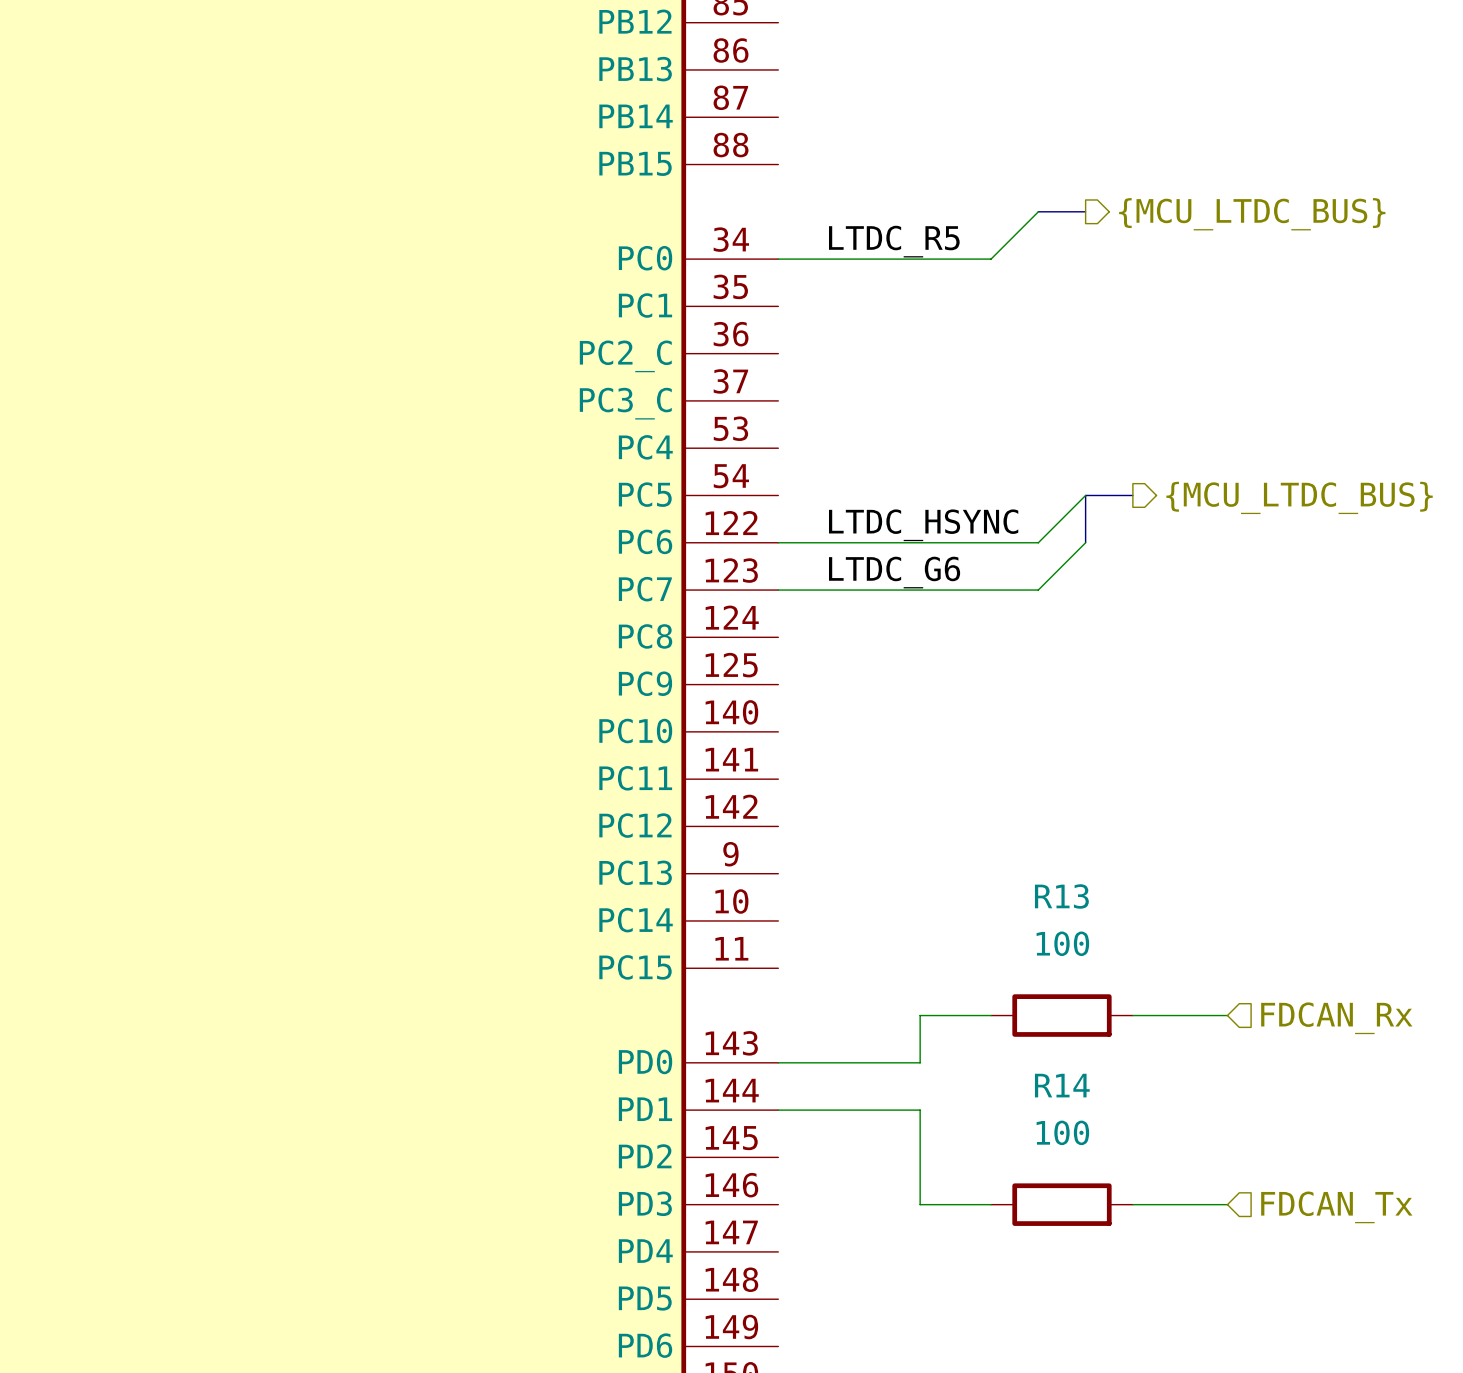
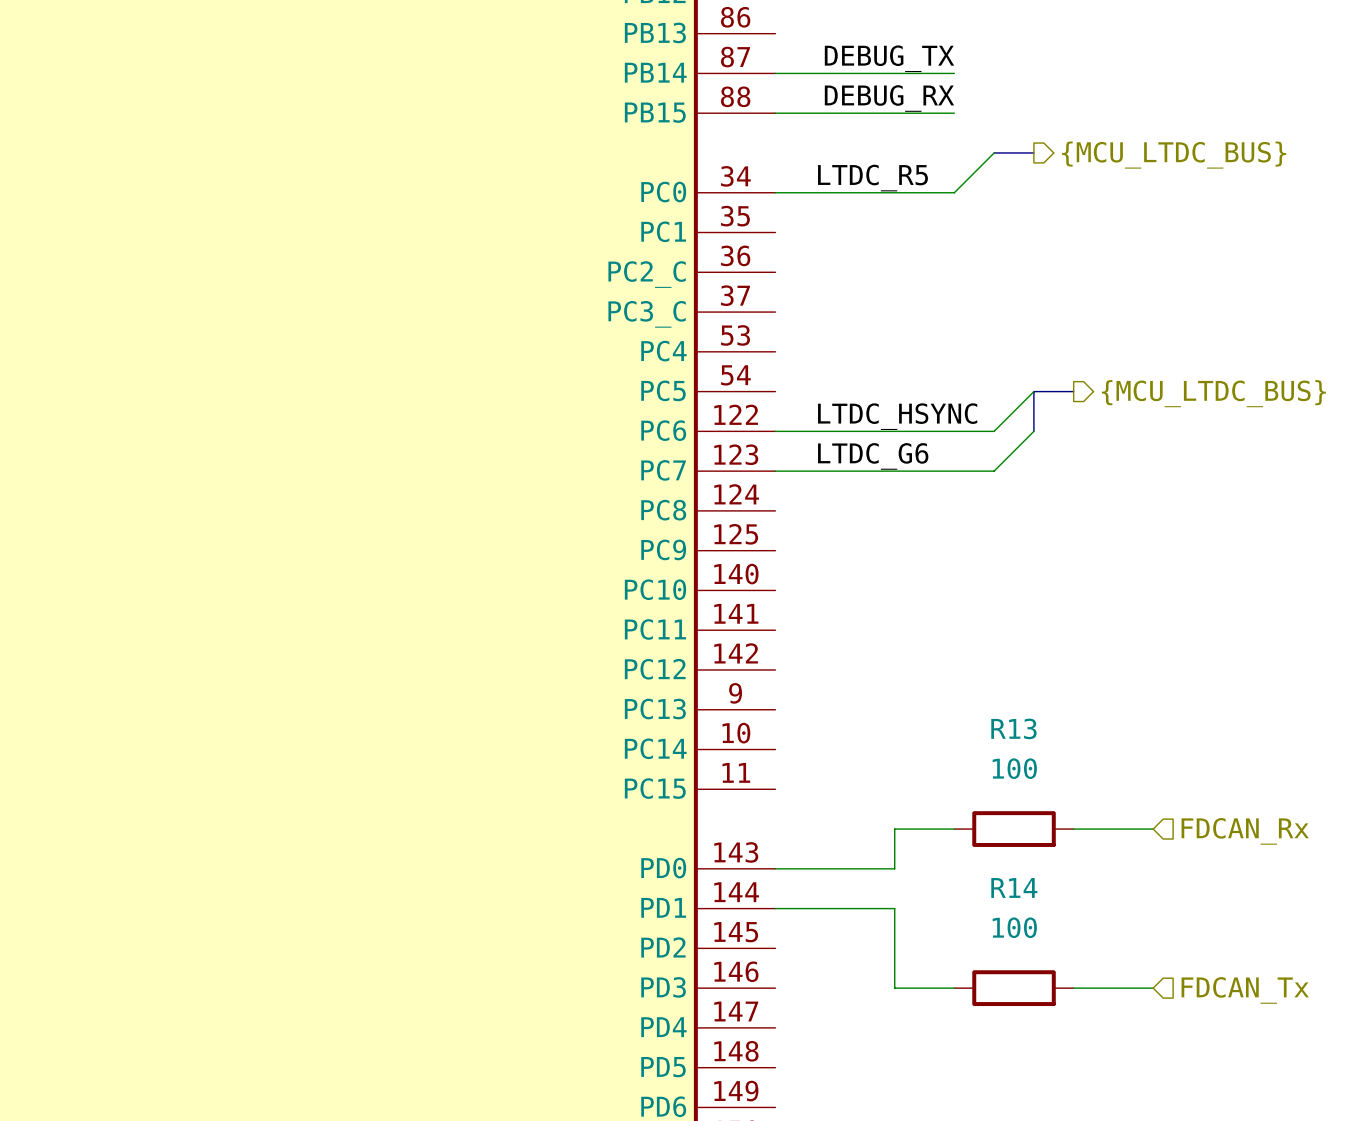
label: none -> DEBUG_TX (889, 58)
wire: none -> (775, 73) (954, 73)
label: none -> DEBUG_RX (889, 98)
wire: none -> (775, 113) (954, 113)

